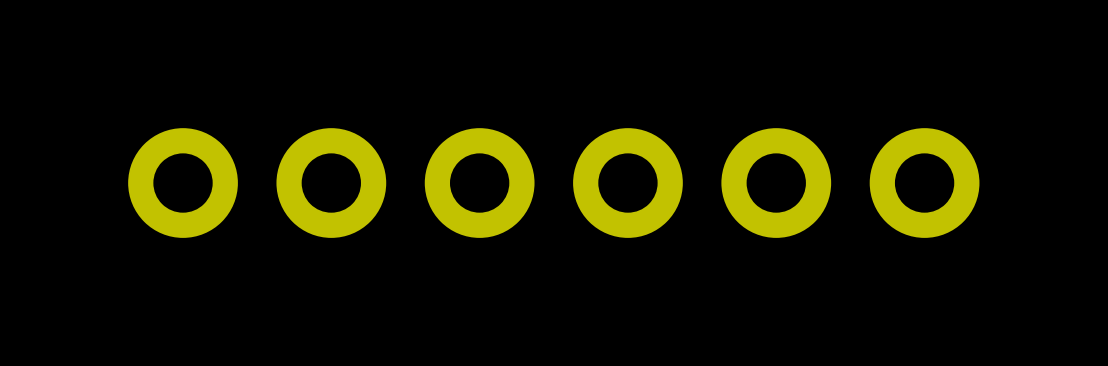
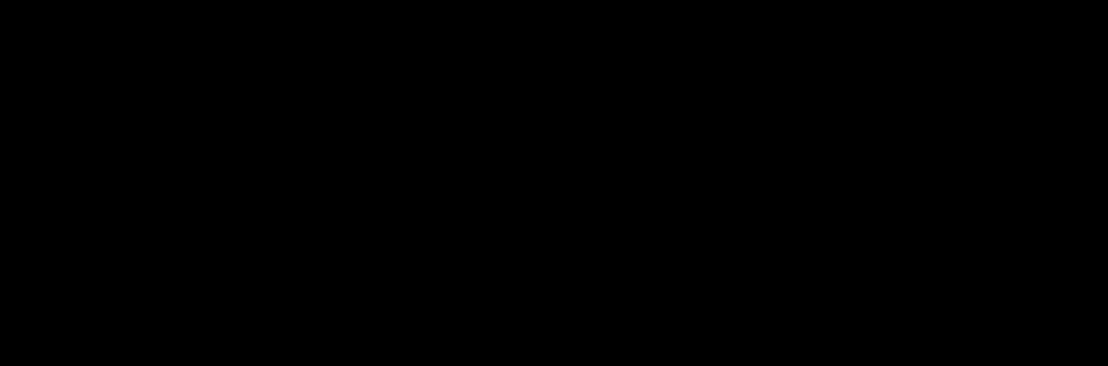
part: (553, 183) -> none

